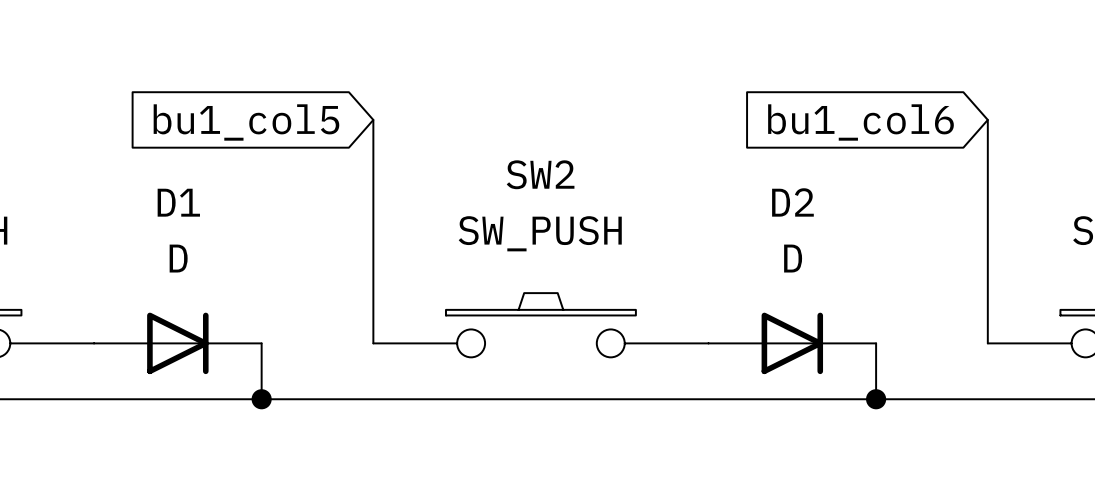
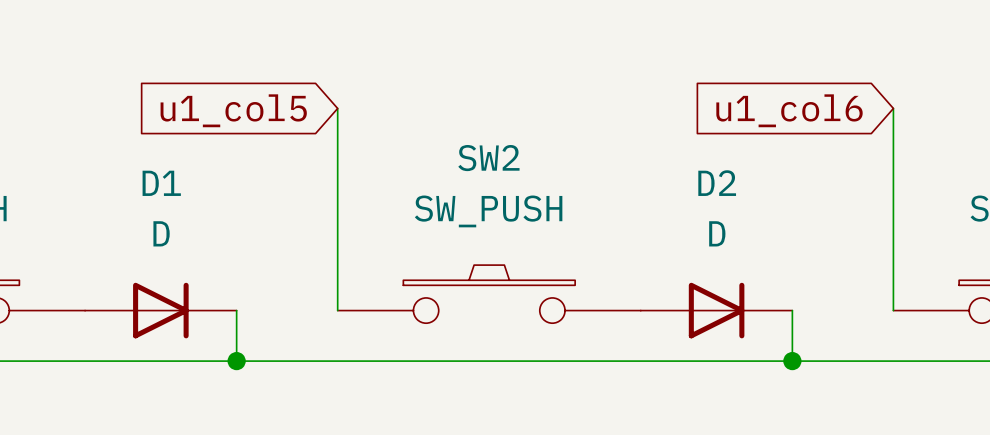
global label: bu1_col5 (246, 122) -> u1_col5 (233, 110)
global label: bu1_col6 (860, 122) -> u1_col6 (789, 110)

